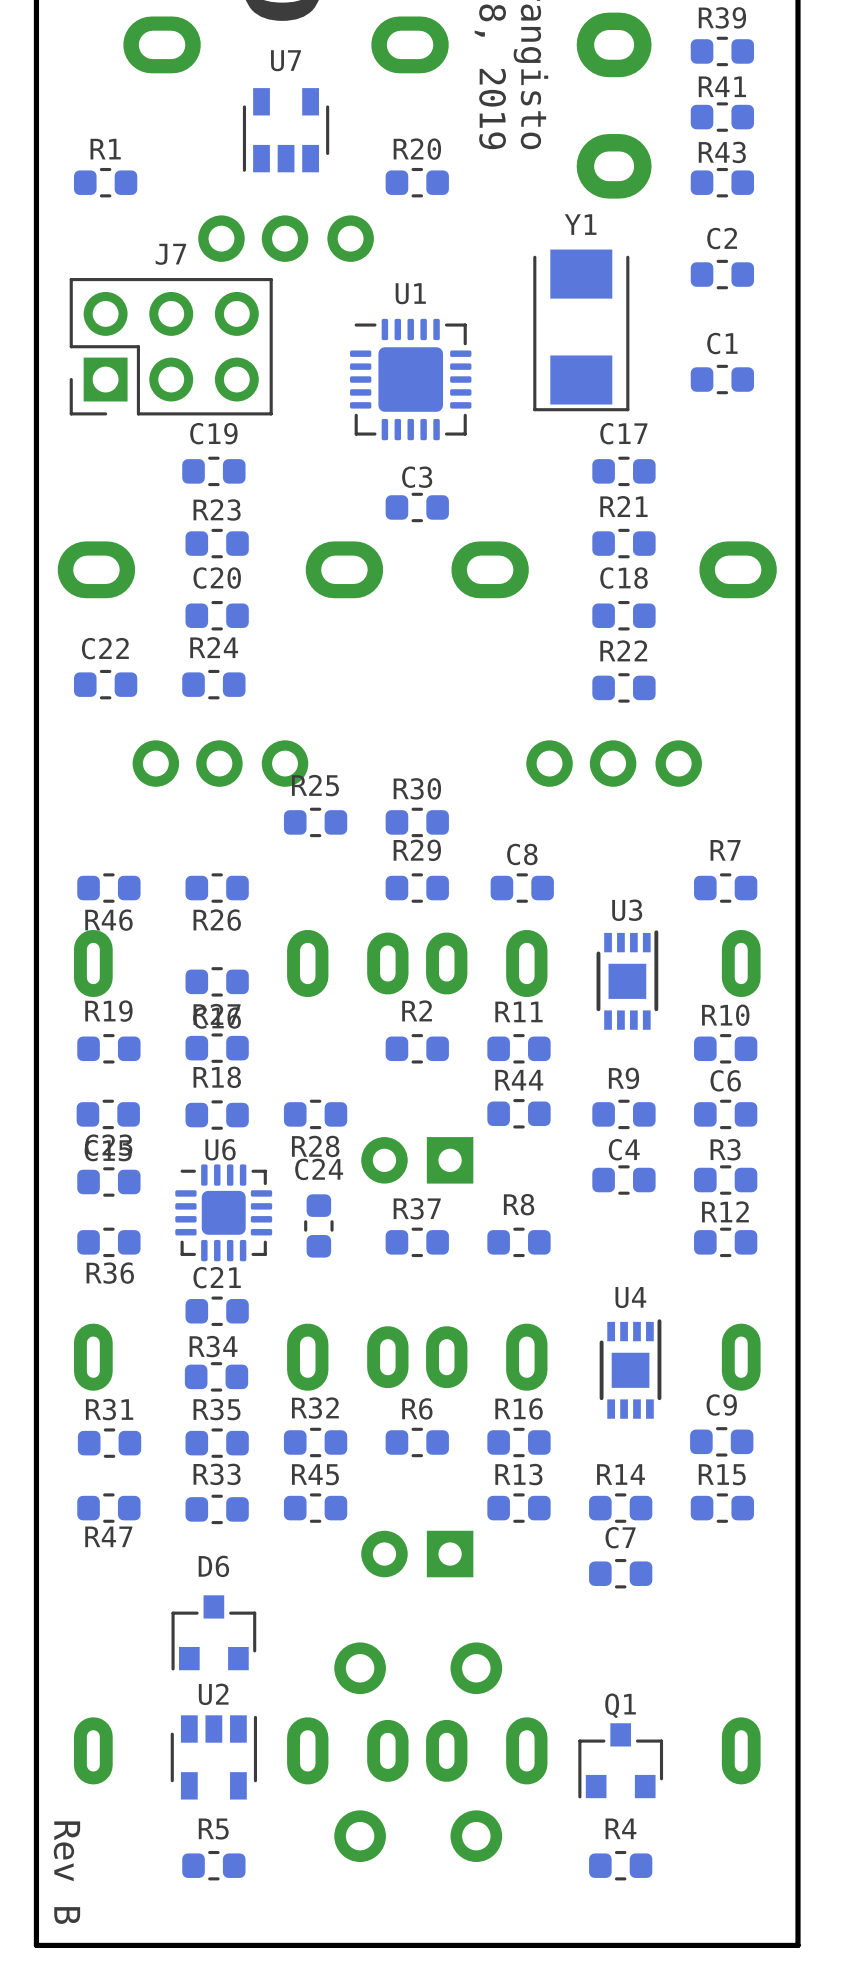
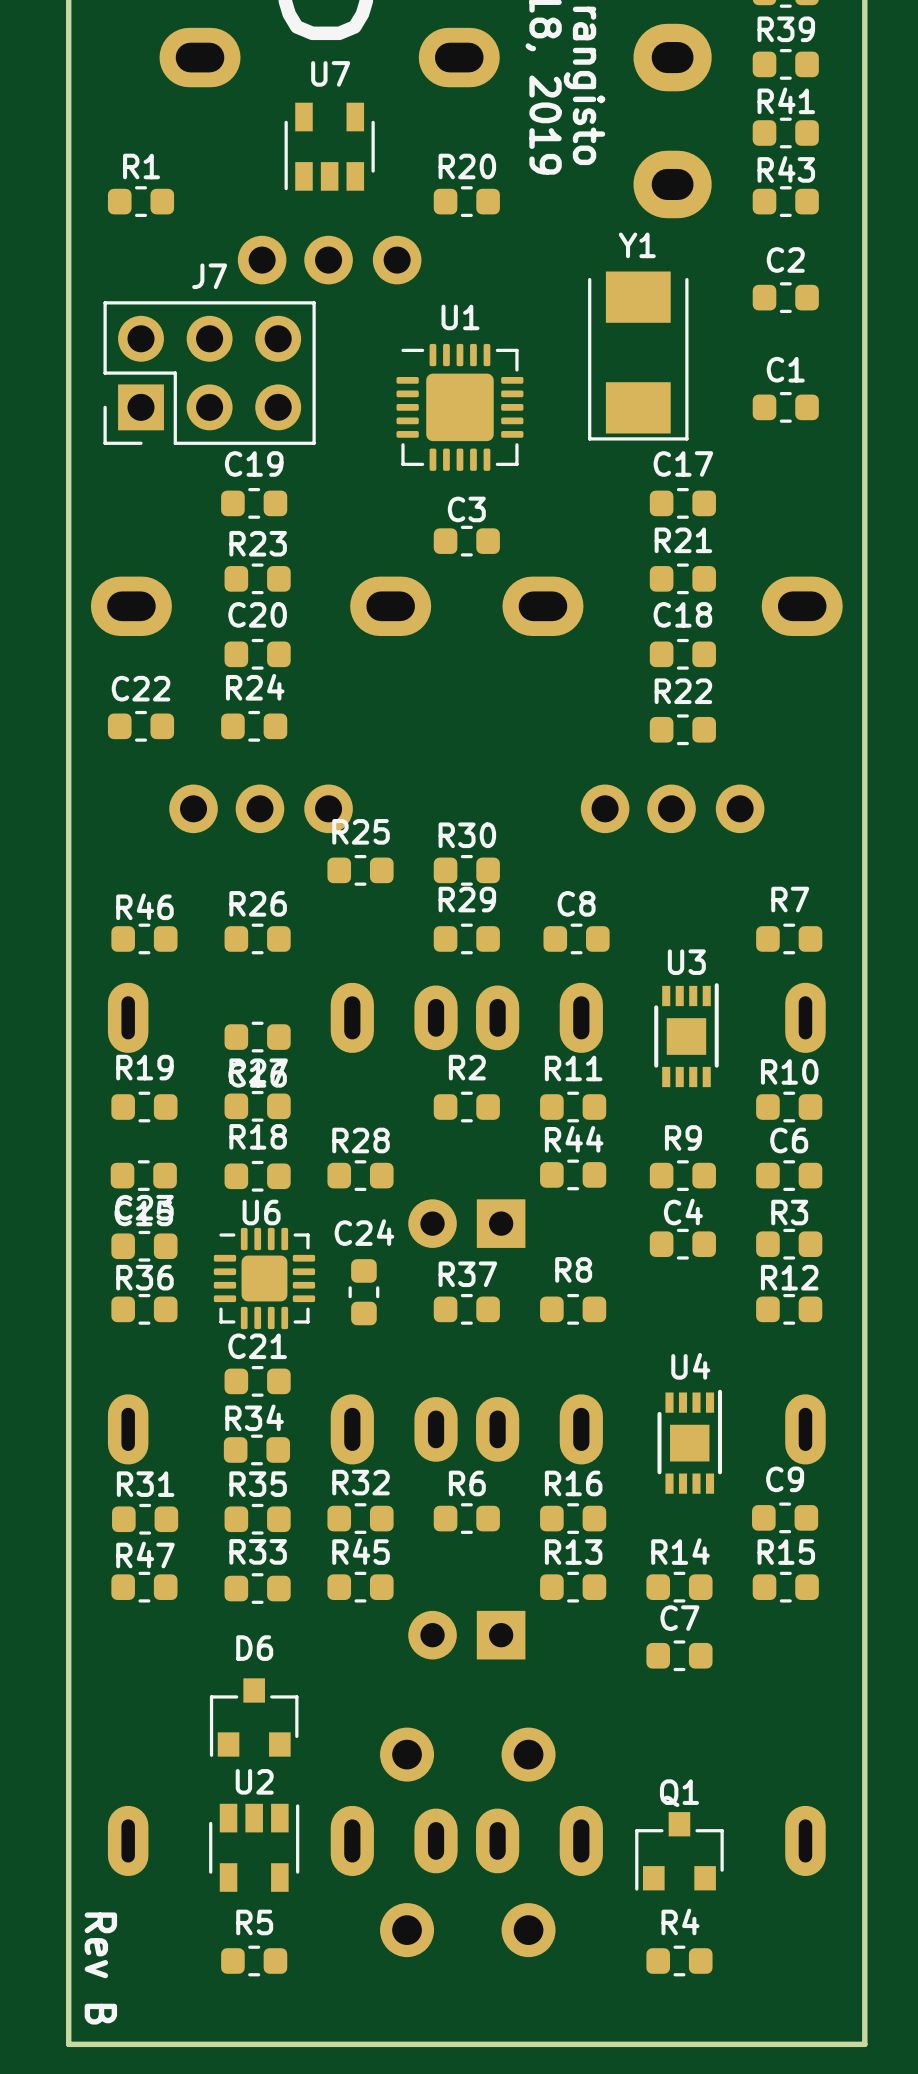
R46 name position: R46 (108, 920) -> R46 (144, 906)
R26 name position: R26 (217, 920) -> R26 (258, 903)
R28 name position: R28 (315, 1146) -> R28 (361, 1140)
R36 name position: R36 (110, 1273) -> R36 (144, 1277)
R47 name position: R47 (108, 1536) -> R47 (145, 1554)

